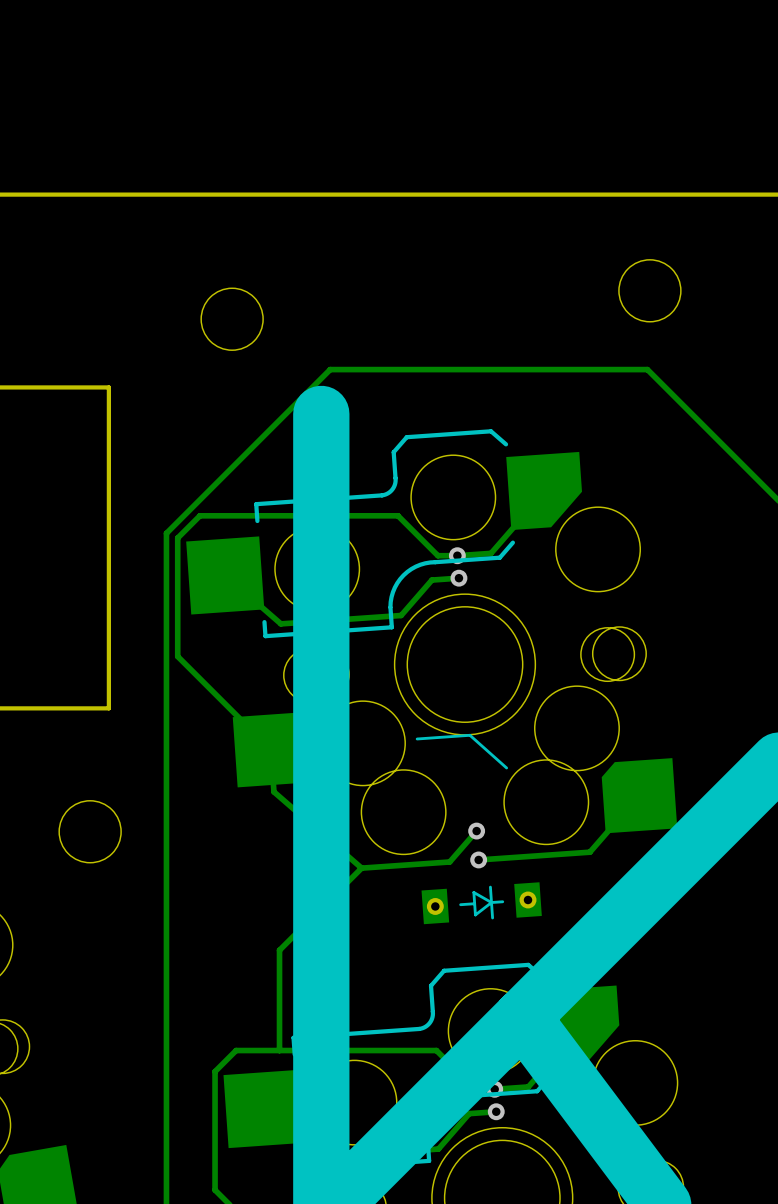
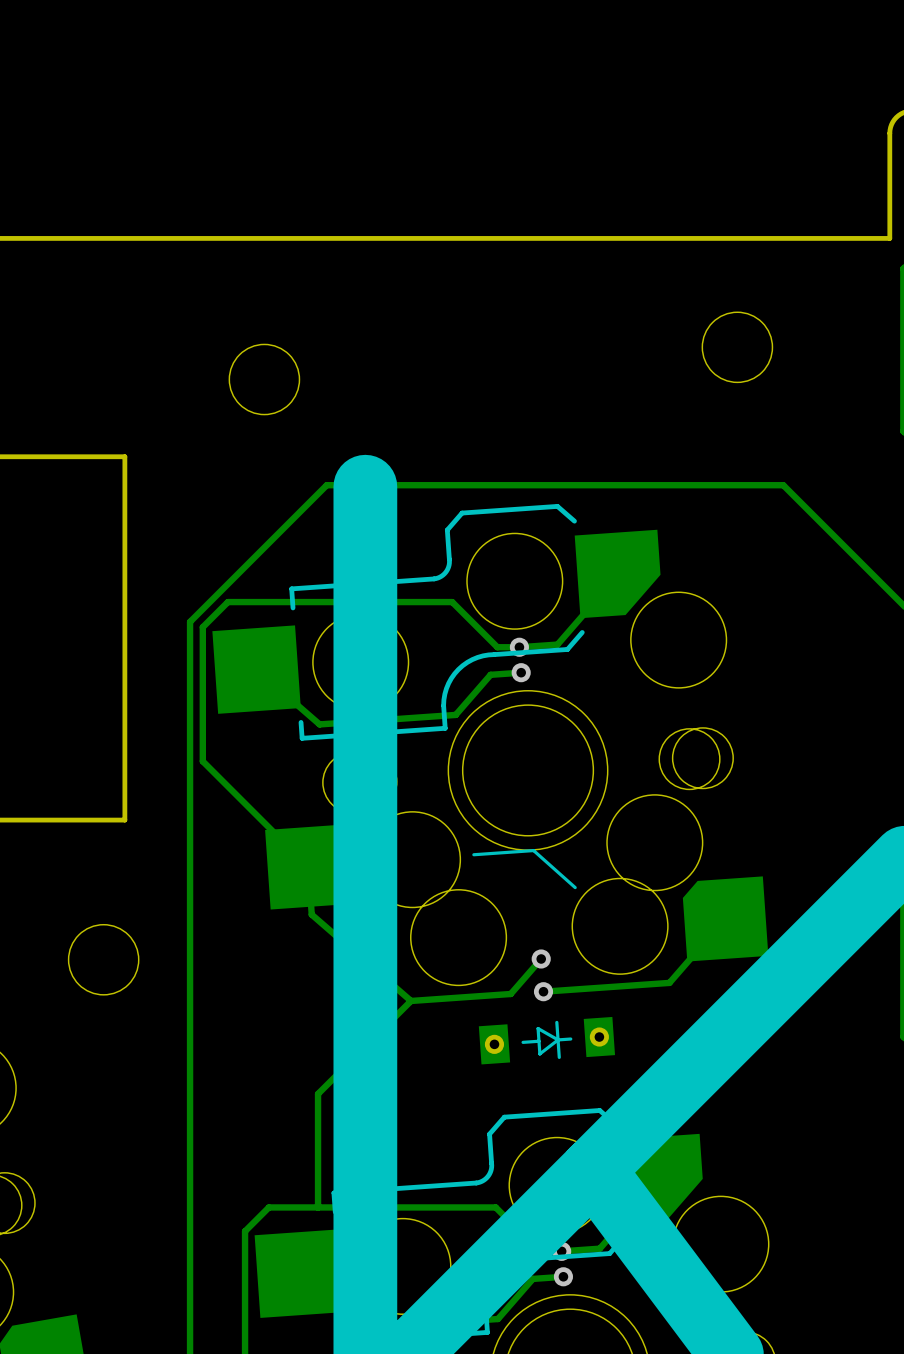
track: (690, 412) (647, 369) (330, 369) (287, 412) -> (783, 485) (326, 485)

